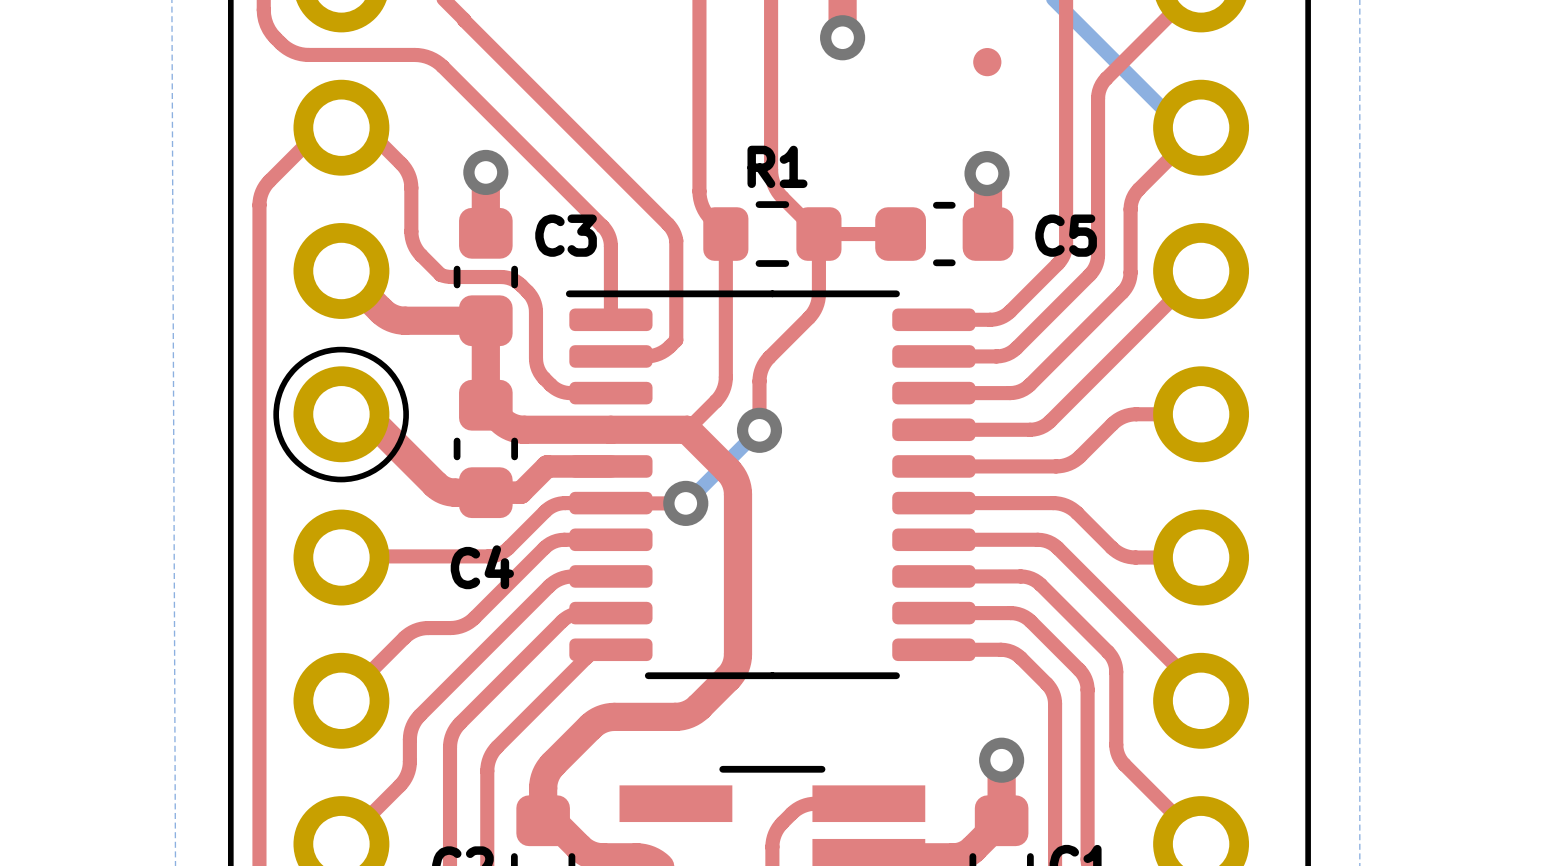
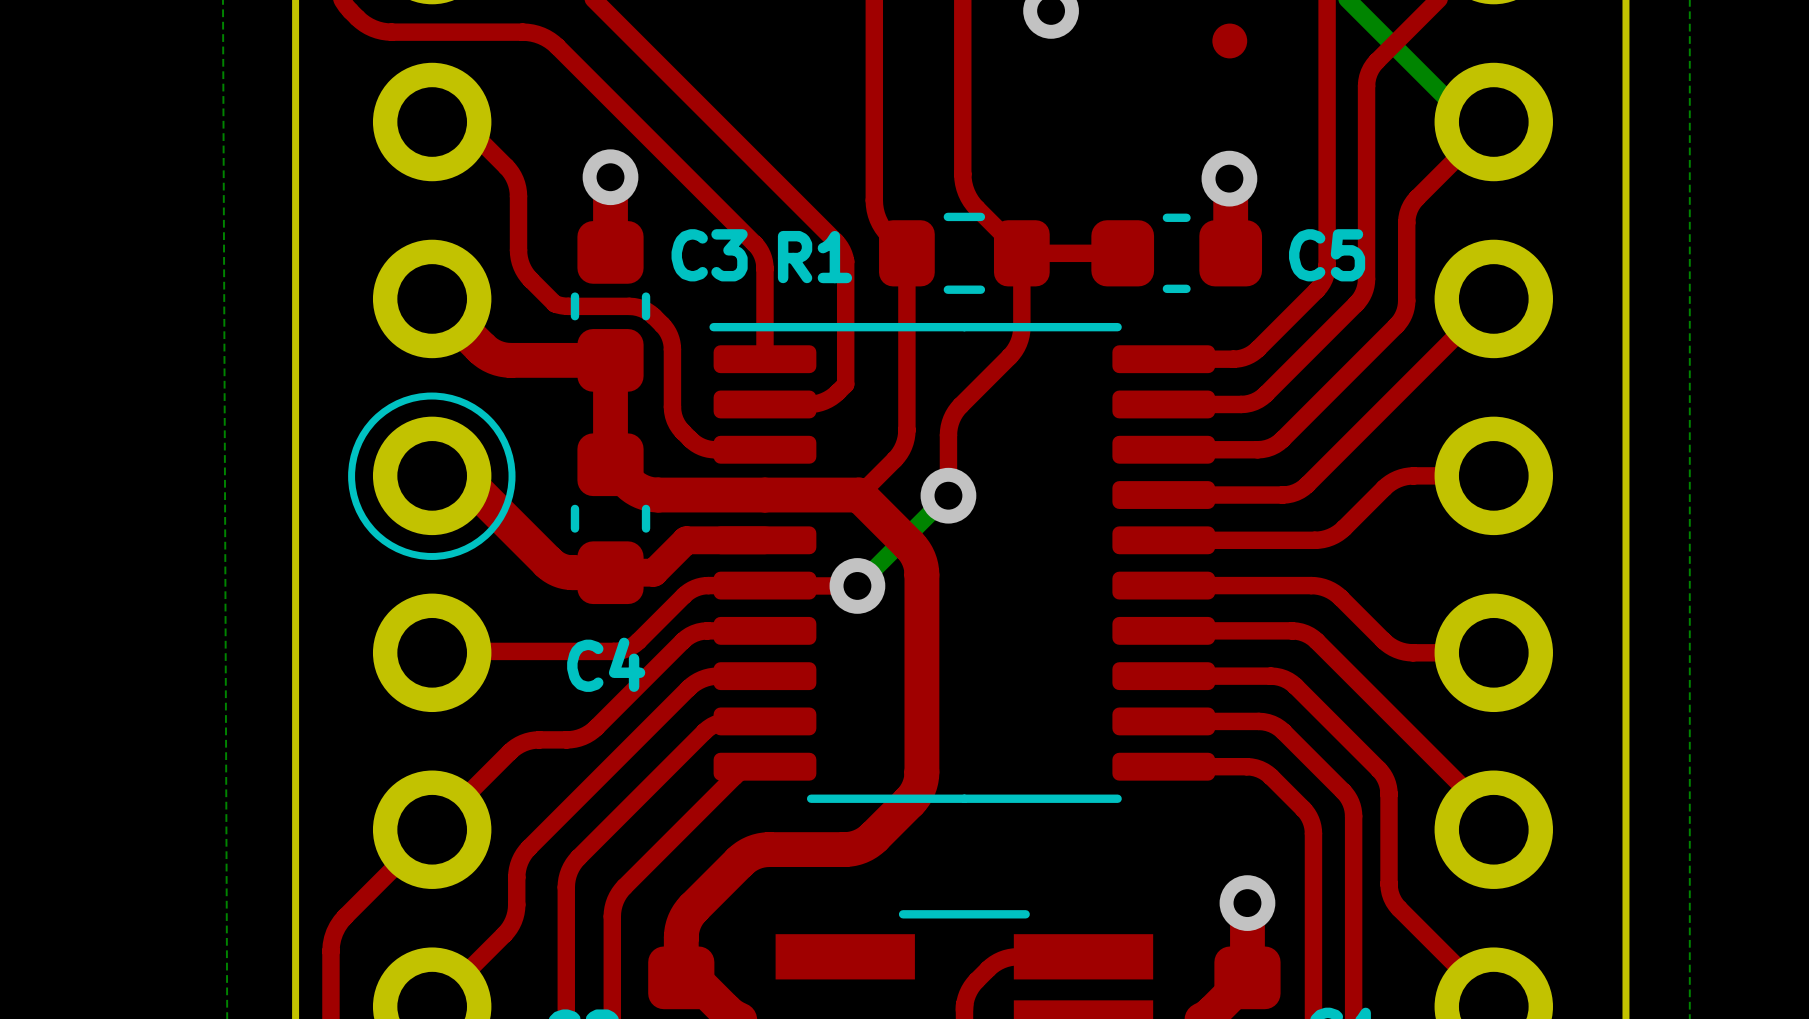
top track: (322, 127) (267, 183) (259, 201) (259, 799) -> (432, 829) (341, 921) (334, 932) (330, 951)
R1 name position: R1 (777, 166) -> R1 (814, 257)

